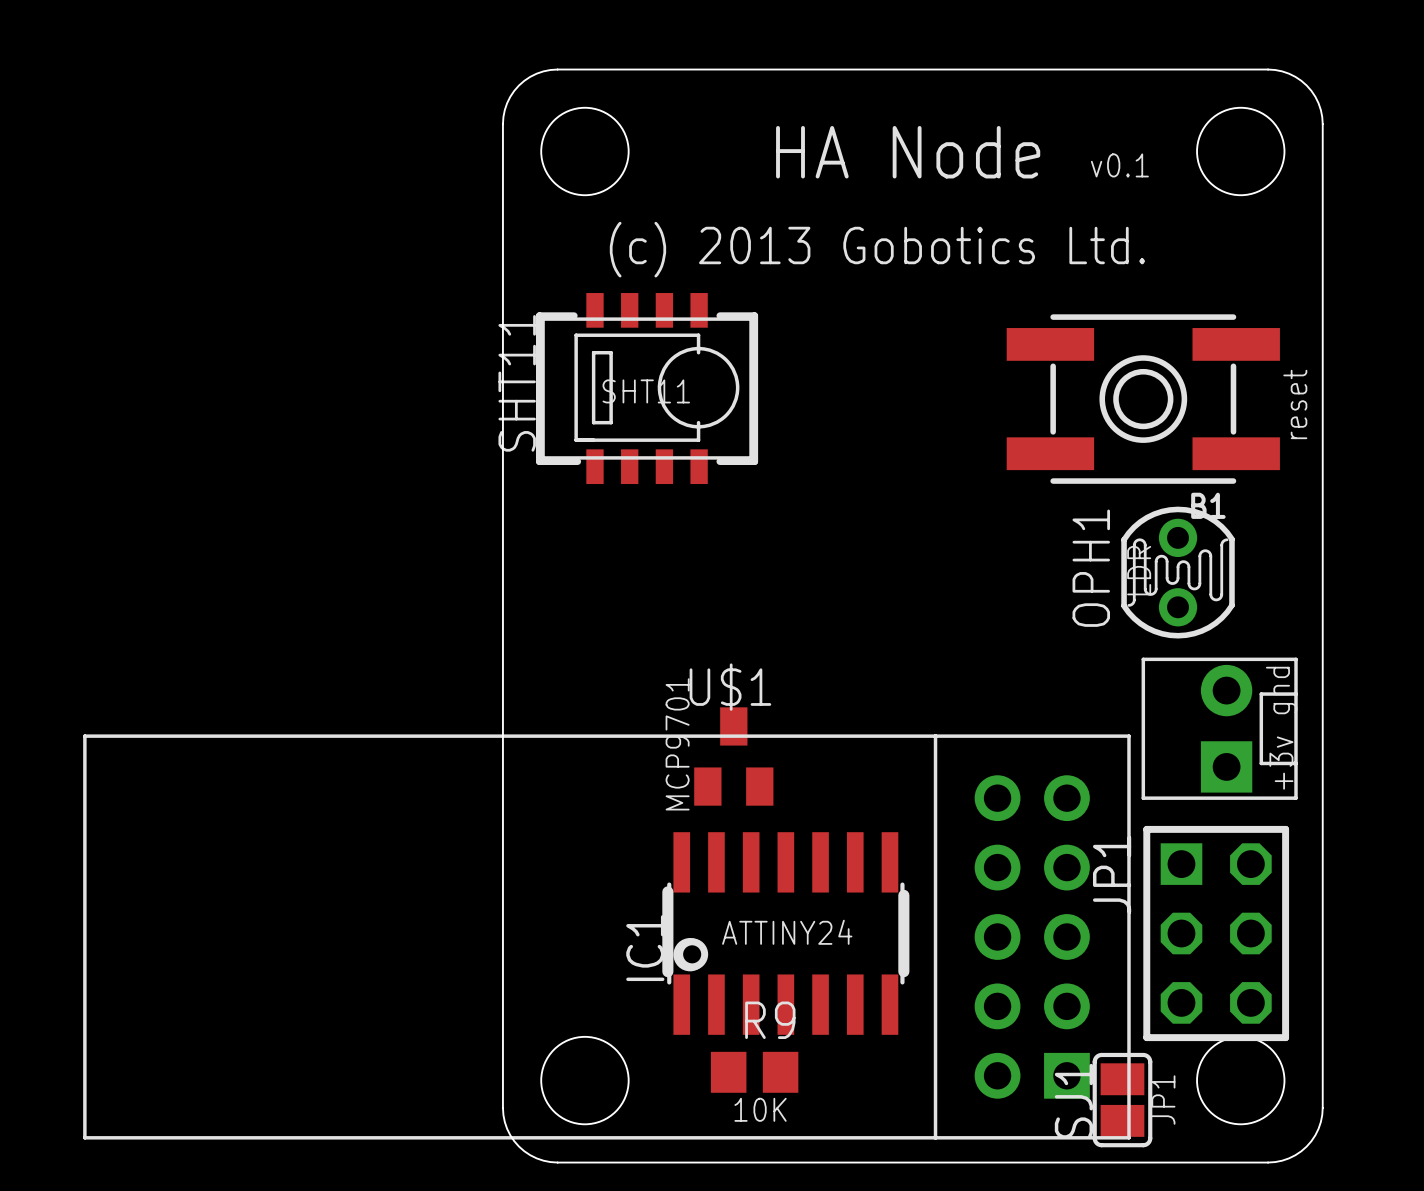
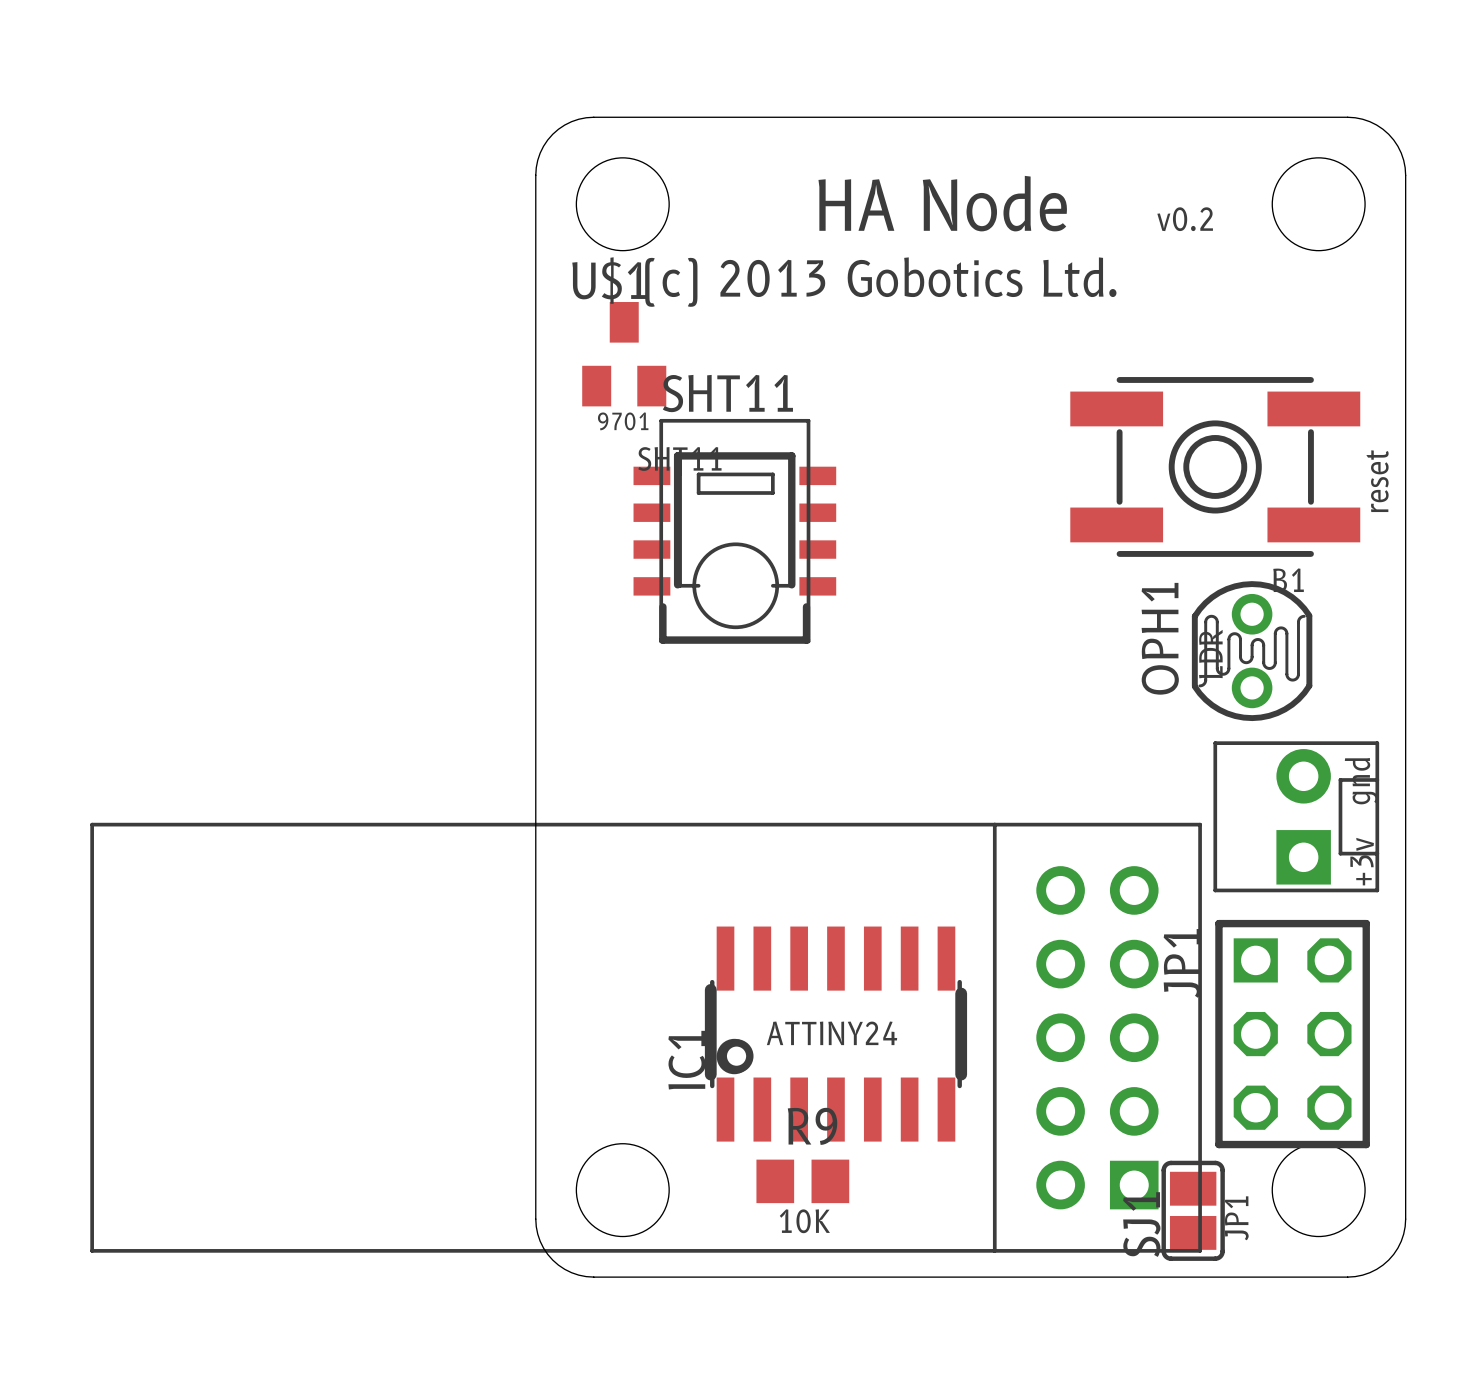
text: v0.1 (1119, 165) -> v0.2 (1185, 219)
text position: (c) 2013 Gobotics Ltd. (877, 249) -> (c) 2013 Gobotics Ltd. (880, 282)
line: (574, 315) (539, 315) (539, 461) (577, 461) -> none
line: (719, 315) (754, 315) (754, 461) (719, 461) -> none
text: none -> 9701 (623, 421)
part rotation: 0° (647, 388) -> 90° clockwise (734, 531)
line: none -> (677, 584) (677, 455) (791, 455) (791, 584)
line: none -> (662, 606) (662, 640) (806, 640) (806, 606)
text: MCP9701 (677, 744) -> none
U$1 position: (733, 756) -> (624, 354)

